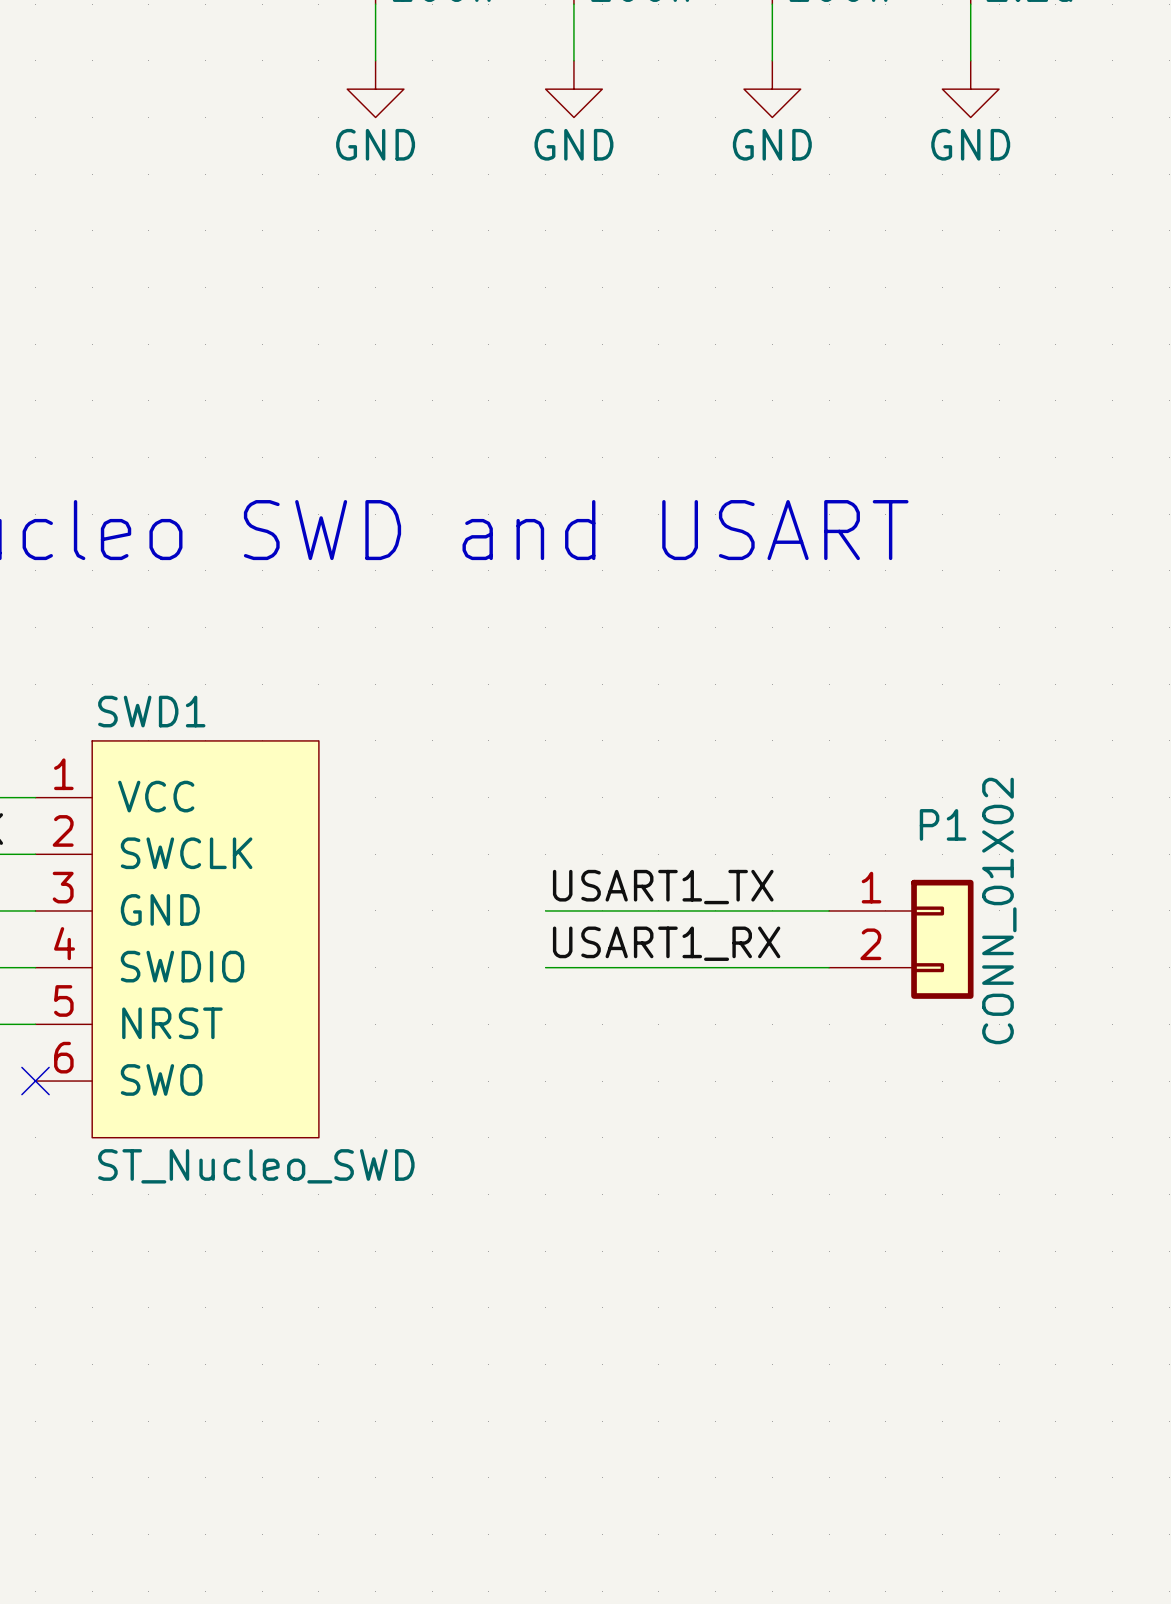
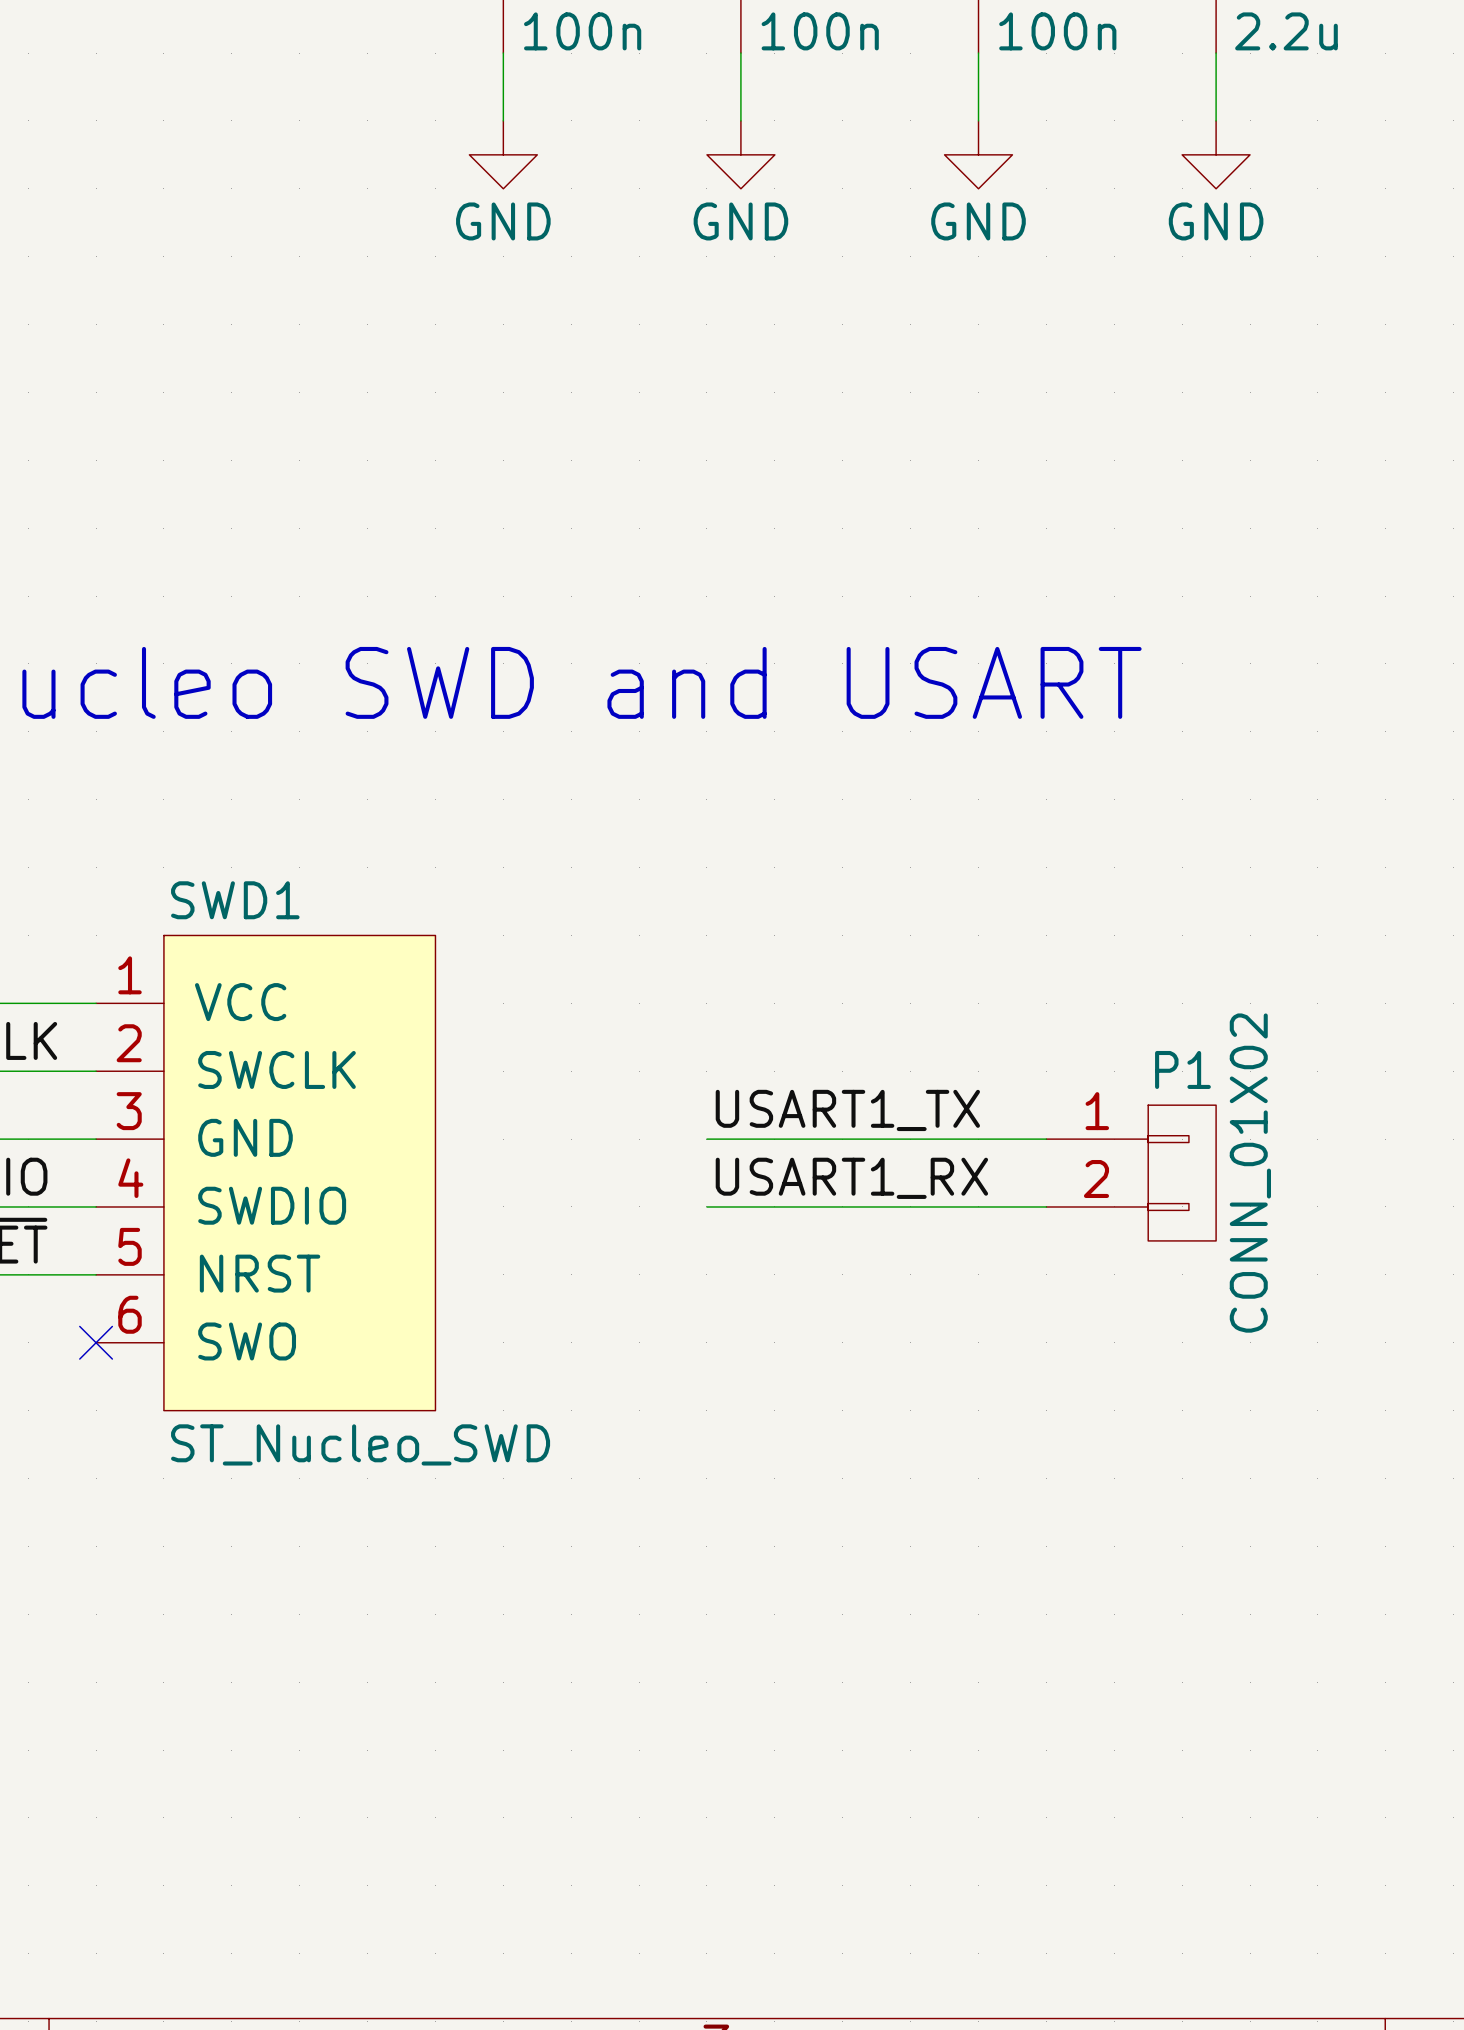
P1 symbol: [829, 879, 974, 999] -> [1046, 1105, 1217, 1241]

